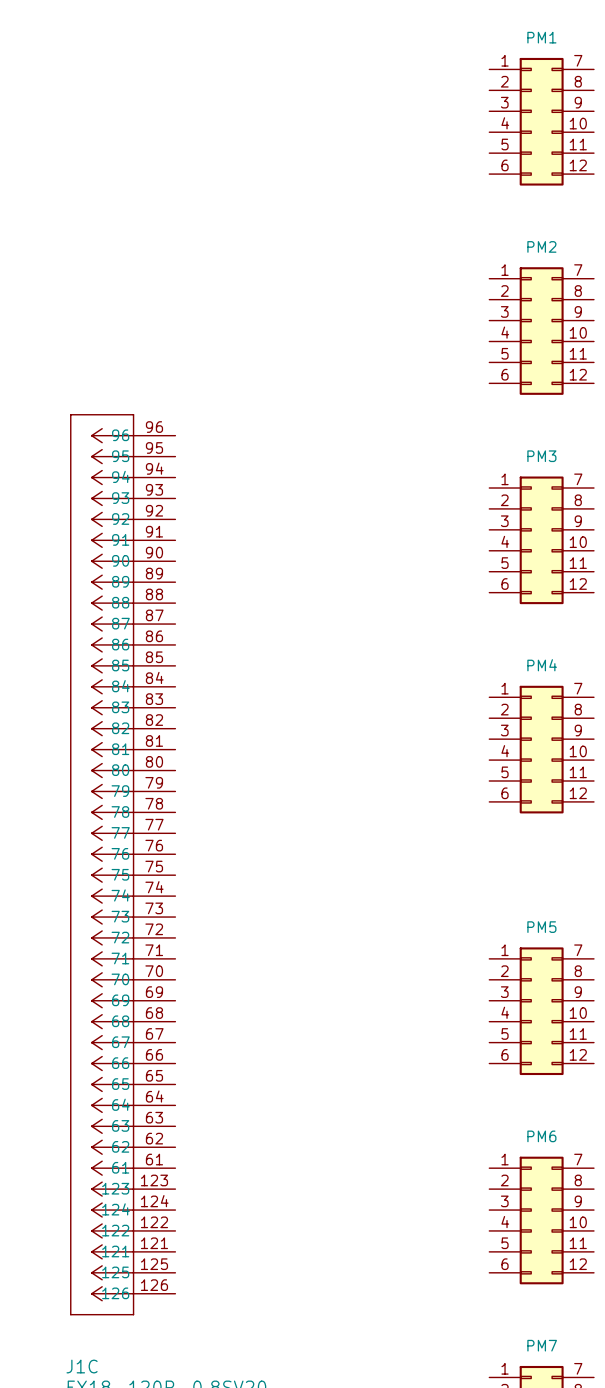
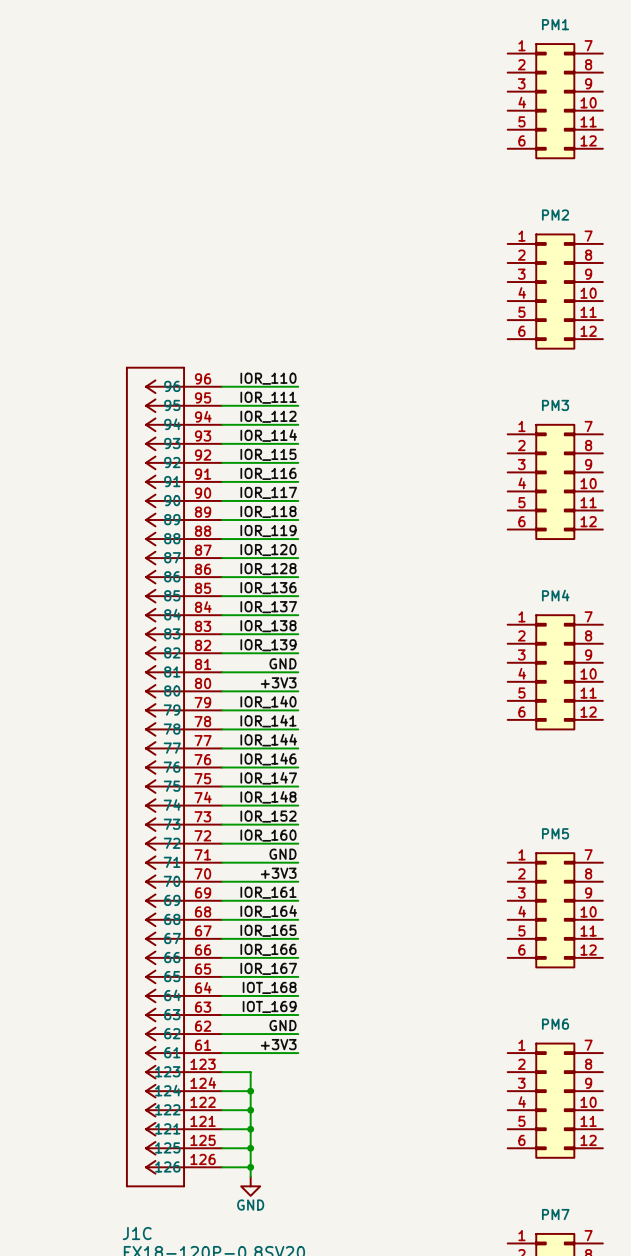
label: none -> IOR_110 (268, 378)
wire: none -> (222, 386) (298, 386)
label: none -> IOR_111 (268, 397)
wire: none -> (222, 405) (298, 405)
label: none -> IOR_112 (268, 416)
wire: none -> (222, 424) (298, 424)
label: none -> IOR_114 (268, 435)
wire: none -> (222, 443) (298, 443)
label: none -> IOR_115 (268, 454)
wire: none -> (222, 462) (298, 462)
label: none -> IOR_116 (268, 473)
wire: none -> (222, 481) (298, 481)
label: none -> IOR_117 (268, 492)
wire: none -> (222, 500) (298, 500)
label: none -> IOR_118 (268, 511)
wire: none -> (222, 520) (298, 520)
label: none -> IOR_119 (268, 531)
wire: none -> (222, 539) (298, 539)
label: none -> IOR_120 (268, 550)
wire: none -> (222, 558) (298, 558)
label: none -> IOR_128 (268, 569)
wire: none -> (222, 577) (298, 577)
label: none -> IOR_136 (268, 588)
wire: none -> (222, 596) (298, 596)
label: none -> IOR_137 (268, 607)
wire: none -> (222, 615) (298, 615)
label: none -> IOR_138 (268, 626)
wire: none -> (222, 634) (298, 634)
label: none -> IOR_139 (268, 645)
wire: none -> (222, 653) (298, 653)
label: none -> GND (283, 663)
wire: none -> (222, 672) (298, 672)
label: none -> +3V3 (278, 682)
wire: none -> (222, 691) (298, 691)
label: none -> IOR_140 (268, 702)
wire: none -> (222, 710) (298, 710)
label: none -> IOR_141 (268, 721)
wire: none -> (222, 729) (298, 729)
label: none -> IOR_144 (268, 740)
wire: none -> (222, 748) (298, 748)
label: none -> IOR_146 (268, 759)
wire: none -> (222, 767) (298, 767)
label: none -> IOR_147 (268, 778)
wire: none -> (222, 786) (298, 786)
label: none -> IOR_148 (268, 797)
wire: none -> (222, 805) (298, 805)
label: none -> IOR_152 (268, 816)
wire: none -> (222, 824) (298, 824)
label: none -> IOR_160 (268, 835)
wire: none -> (222, 843) (298, 843)
label: none -> GND (283, 854)
wire: none -> (222, 862) (298, 862)
label: none -> +3V3 (278, 873)
wire: none -> (222, 881) (298, 881)
label: none -> IOR_161 (268, 892)
wire: none -> (222, 900) (298, 900)
label: none -> IOR_164 (268, 911)
wire: none -> (222, 919) (298, 919)
label: none -> IOR_165 (268, 930)
wire: none -> (222, 938) (298, 938)
label: none -> IOR_166 (268, 949)
wire: none -> (222, 957) (298, 957)
label: none -> IOR_167 (268, 968)
wire: none -> (222, 976) (298, 976)
label: none -> IOT_168 (269, 987)
wire: none -> (222, 995) (298, 995)
label: none -> IOT_169 (269, 1006)
wire: none -> (222, 1015) (298, 1015)
label: none -> GND (283, 1025)
wire: none -> (222, 1034) (298, 1034)
label: none -> +3V3 (278, 1044)
wire: none -> (222, 1053) (298, 1053)
wire: none -> (222, 1072) (250, 1072) (250, 1176)
wire: none -> (222, 1091) (250, 1091)
junction: none -> (250, 1091)
wire: none -> (222, 1110) (250, 1110)
junction: none -> (250, 1110)
wire: none -> (222, 1129) (250, 1129)
junction: none -> (250, 1129)
wire: none -> (222, 1148) (250, 1148)
junction: none -> (250, 1148)
wire: none -> (222, 1167) (250, 1167)
junction: none -> (250, 1167)
power symbol: none -> GND (250, 1186)

